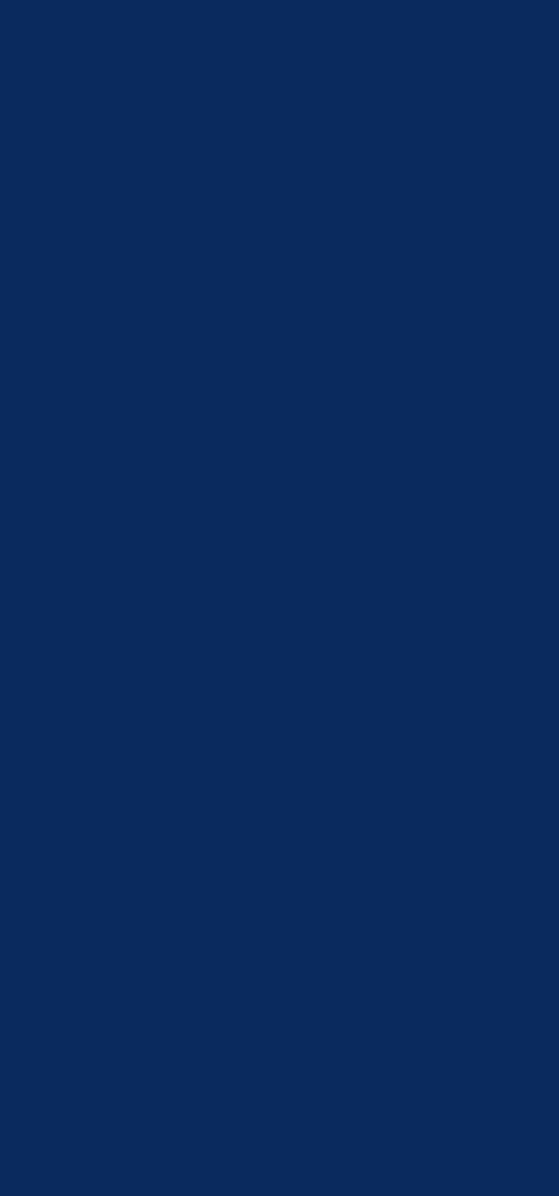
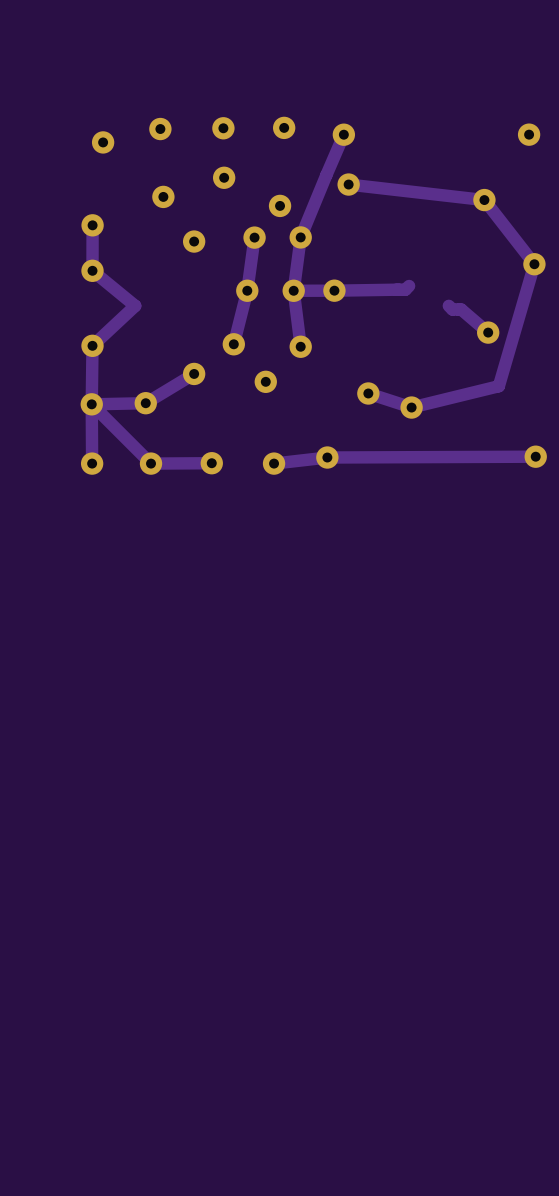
via: none -> (284, 127)
via: none -> (223, 128)
via: none -> (160, 129)
track: none -> (343, 134) (300, 237) (293, 290)
via: none -> (343, 134)
via: none -> (529, 134)
via: none -> (103, 142)
via: none -> (224, 177)
track: none -> (348, 184) (484, 200) (534, 264) (498, 386) (411, 407) (368, 393)
via: none -> (348, 184)
via: none -> (163, 196)
via: none -> (484, 200)
via: none -> (280, 205)
track: none -> (92, 225) (92, 270) (135, 305) (92, 345) (91, 404)
via: none -> (92, 225)
track: none -> (254, 237) (247, 290) (233, 344)
via: none -> (254, 237)
via: none -> (300, 237)
via: none -> (194, 241)
via: none -> (534, 264)
via: none -> (92, 270)
track: none -> (409, 285) (405, 289) (293, 290)
via: none -> (247, 290)
track: none -> (293, 290) (300, 346)
via: none -> (293, 290)
via: none -> (334, 290)
track: none -> (448, 305) (452, 309) (461, 309) (488, 332)
via: none -> (488, 332)
via: none -> (233, 344)
via: none -> (92, 345)
via: none -> (300, 346)
track: none -> (194, 373) (145, 403) (91, 404)
via: none -> (194, 373)
via: none -> (265, 381)
via: none -> (368, 393)
via: none -> (145, 403)
track: none -> (91, 404) (151, 463) (211, 463)
track: none -> (91, 404) (92, 463)
via: none -> (91, 404)
via: none -> (411, 407)
track: none -> (535, 456) (327, 457) (274, 463)
via: none -> (535, 456)
via: none -> (327, 457)
via: none -> (92, 463)
via: none -> (151, 463)
via: none -> (211, 463)
via: none -> (274, 463)

